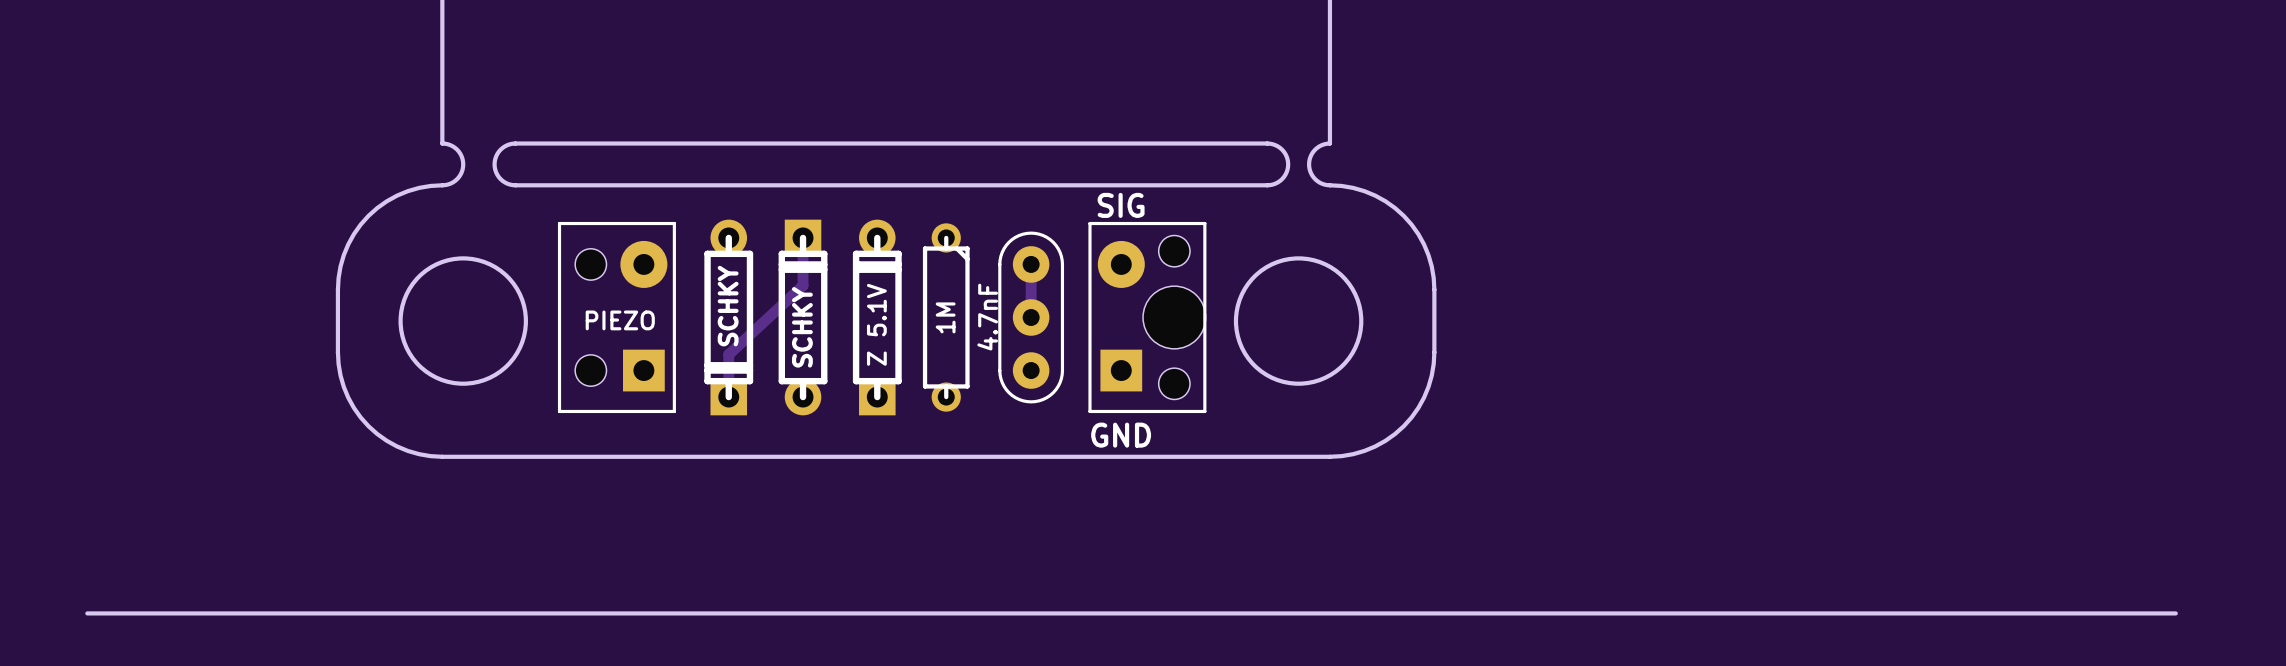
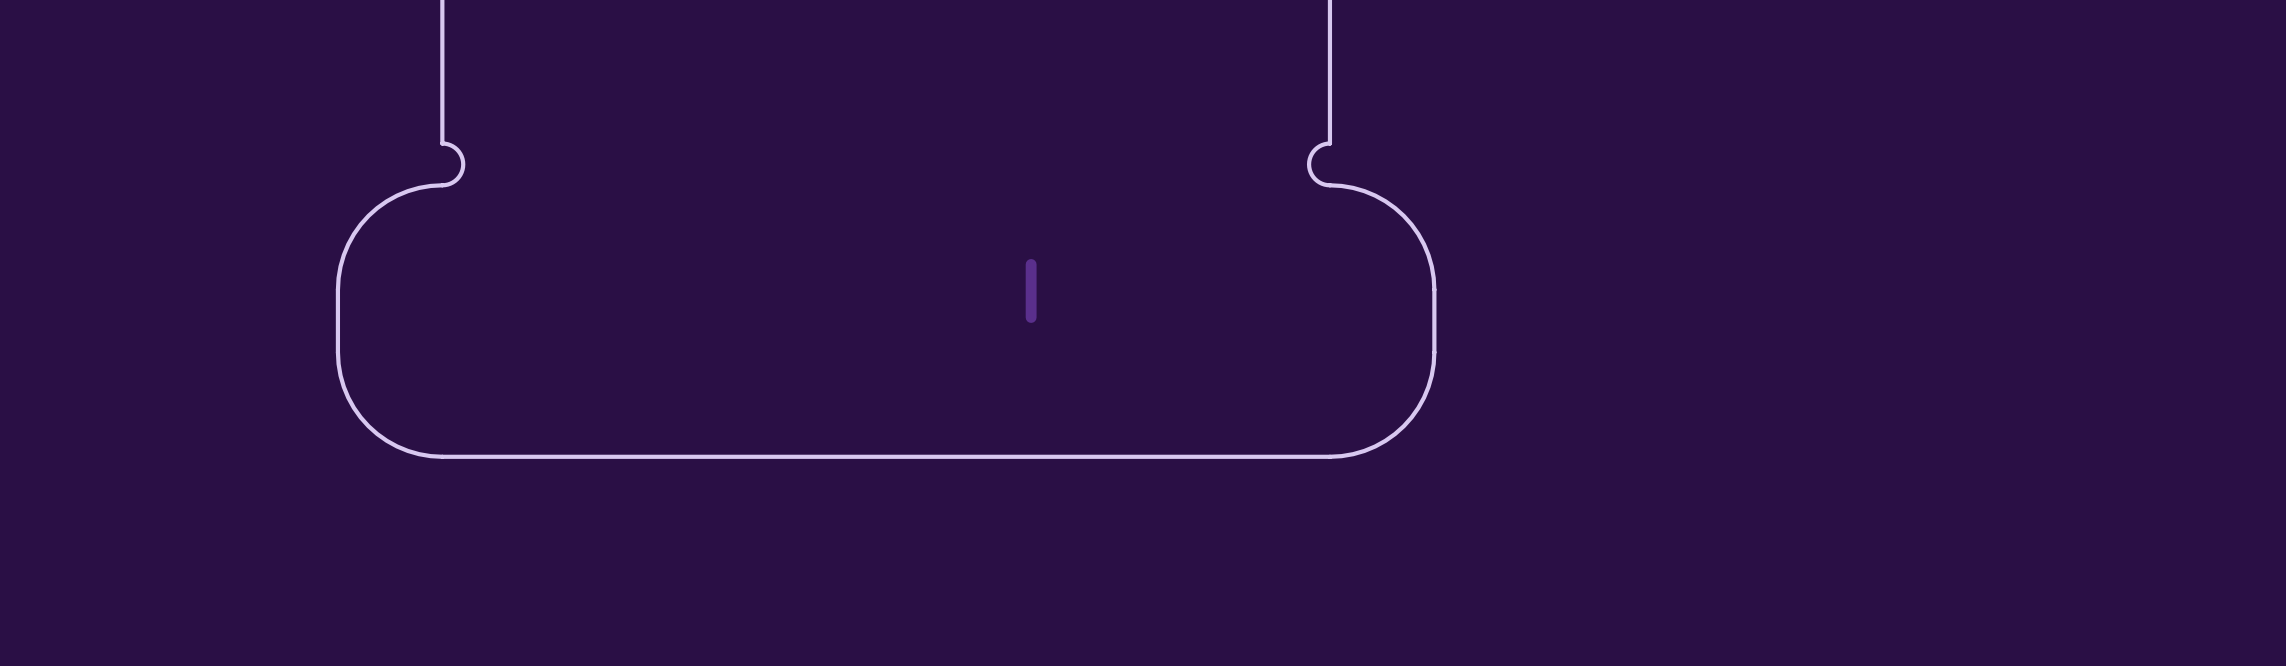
board edge: (515, 143) (1267, 143) (1275, 145) (1282, 149) (1286, 156) (1288, 164) (1286, 172) (1282, 179) (1275, 183) (1267, 185) (515, 185) (507, 183) (500, 179) (496, 172) (494, 164) (496, 156) (500, 149) (507, 145) (515, 143) -> none
text: SIG (1121, 205) -> none
track: (803, 237) (803, 285) (728, 354) (728, 397) -> none
round board edge: [398, 256, 528, 386] -> none
round board edge: [1233, 256, 1364, 386] -> none
PIEZO: (616, 317) -> none
SCHKY: (728, 317) -> none
SCHKY: (803, 317) -> none
Z 5.1V: (877, 317) -> none
part: 1M (946, 317) -> none
4.7nF: (1031, 317) -> none
part: (1147, 317) -> none
text: GND (1121, 435) -> none
board edge: (87, 613) (2175, 613) -> none

